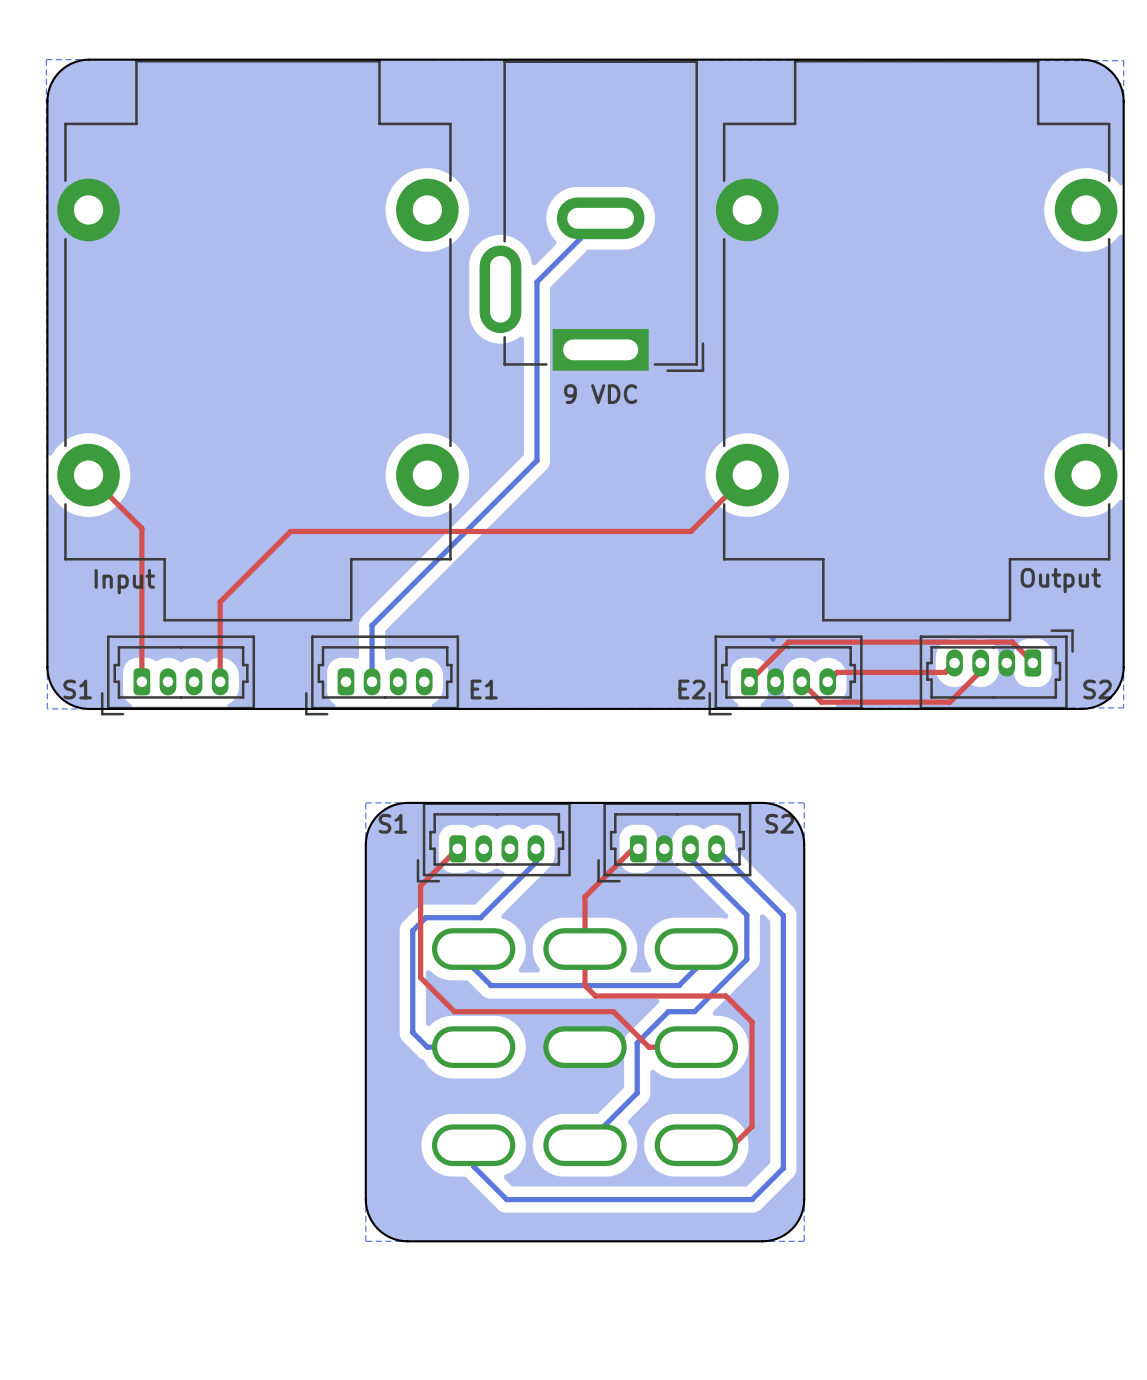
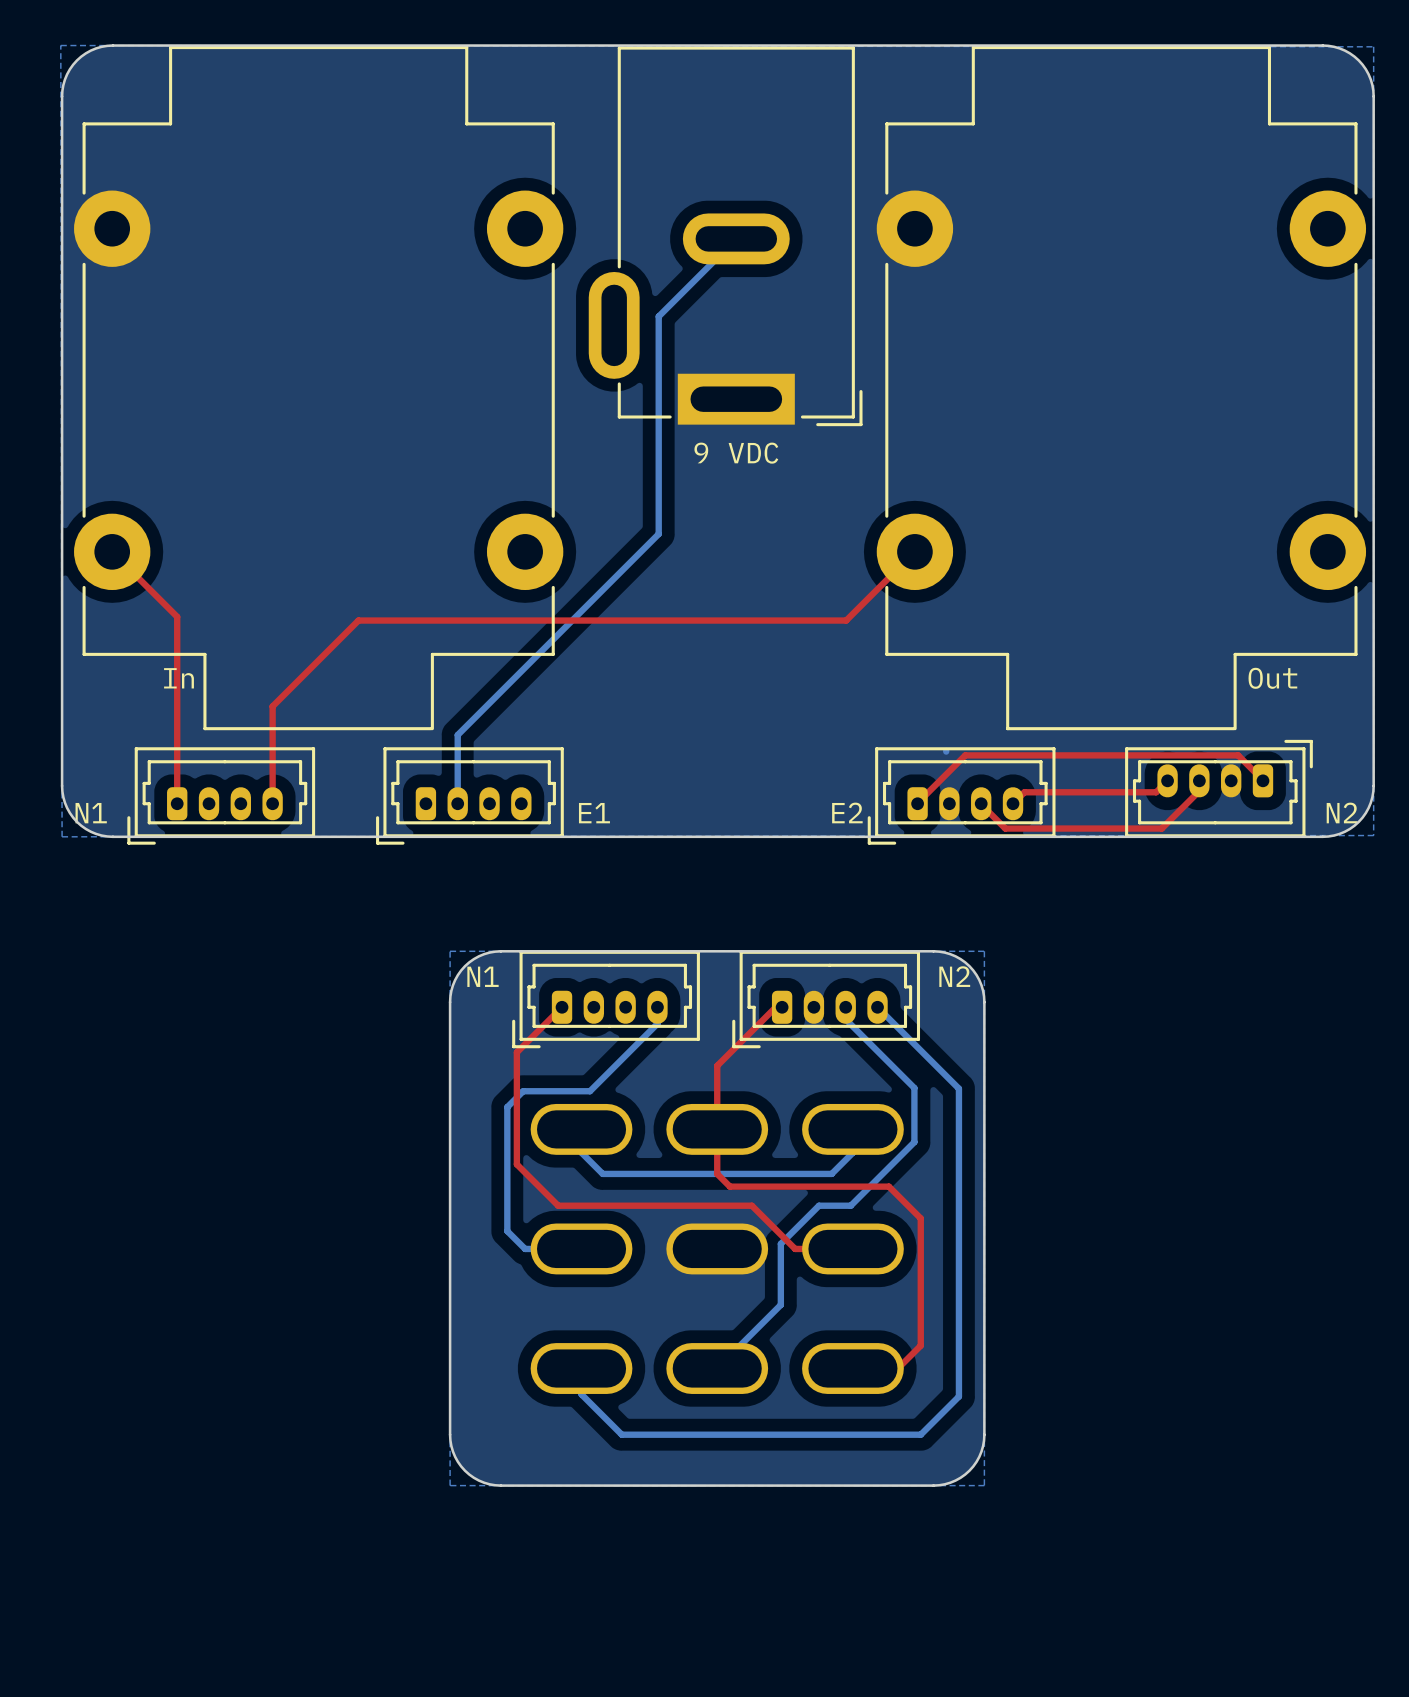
part value: Output (1060, 580) -> Out (1272, 678)
part value: Input (124, 581) -> In (179, 678)
part text: none -> N1 (91, 813)
part text: S1 (77, 689) -> none
part text: S2 (1097, 689) -> N2 (1342, 812)
part text: none -> N1 (483, 976)
part text: S1 (392, 823) -> none
part text: S2 (779, 823) -> N2 (954, 976)

